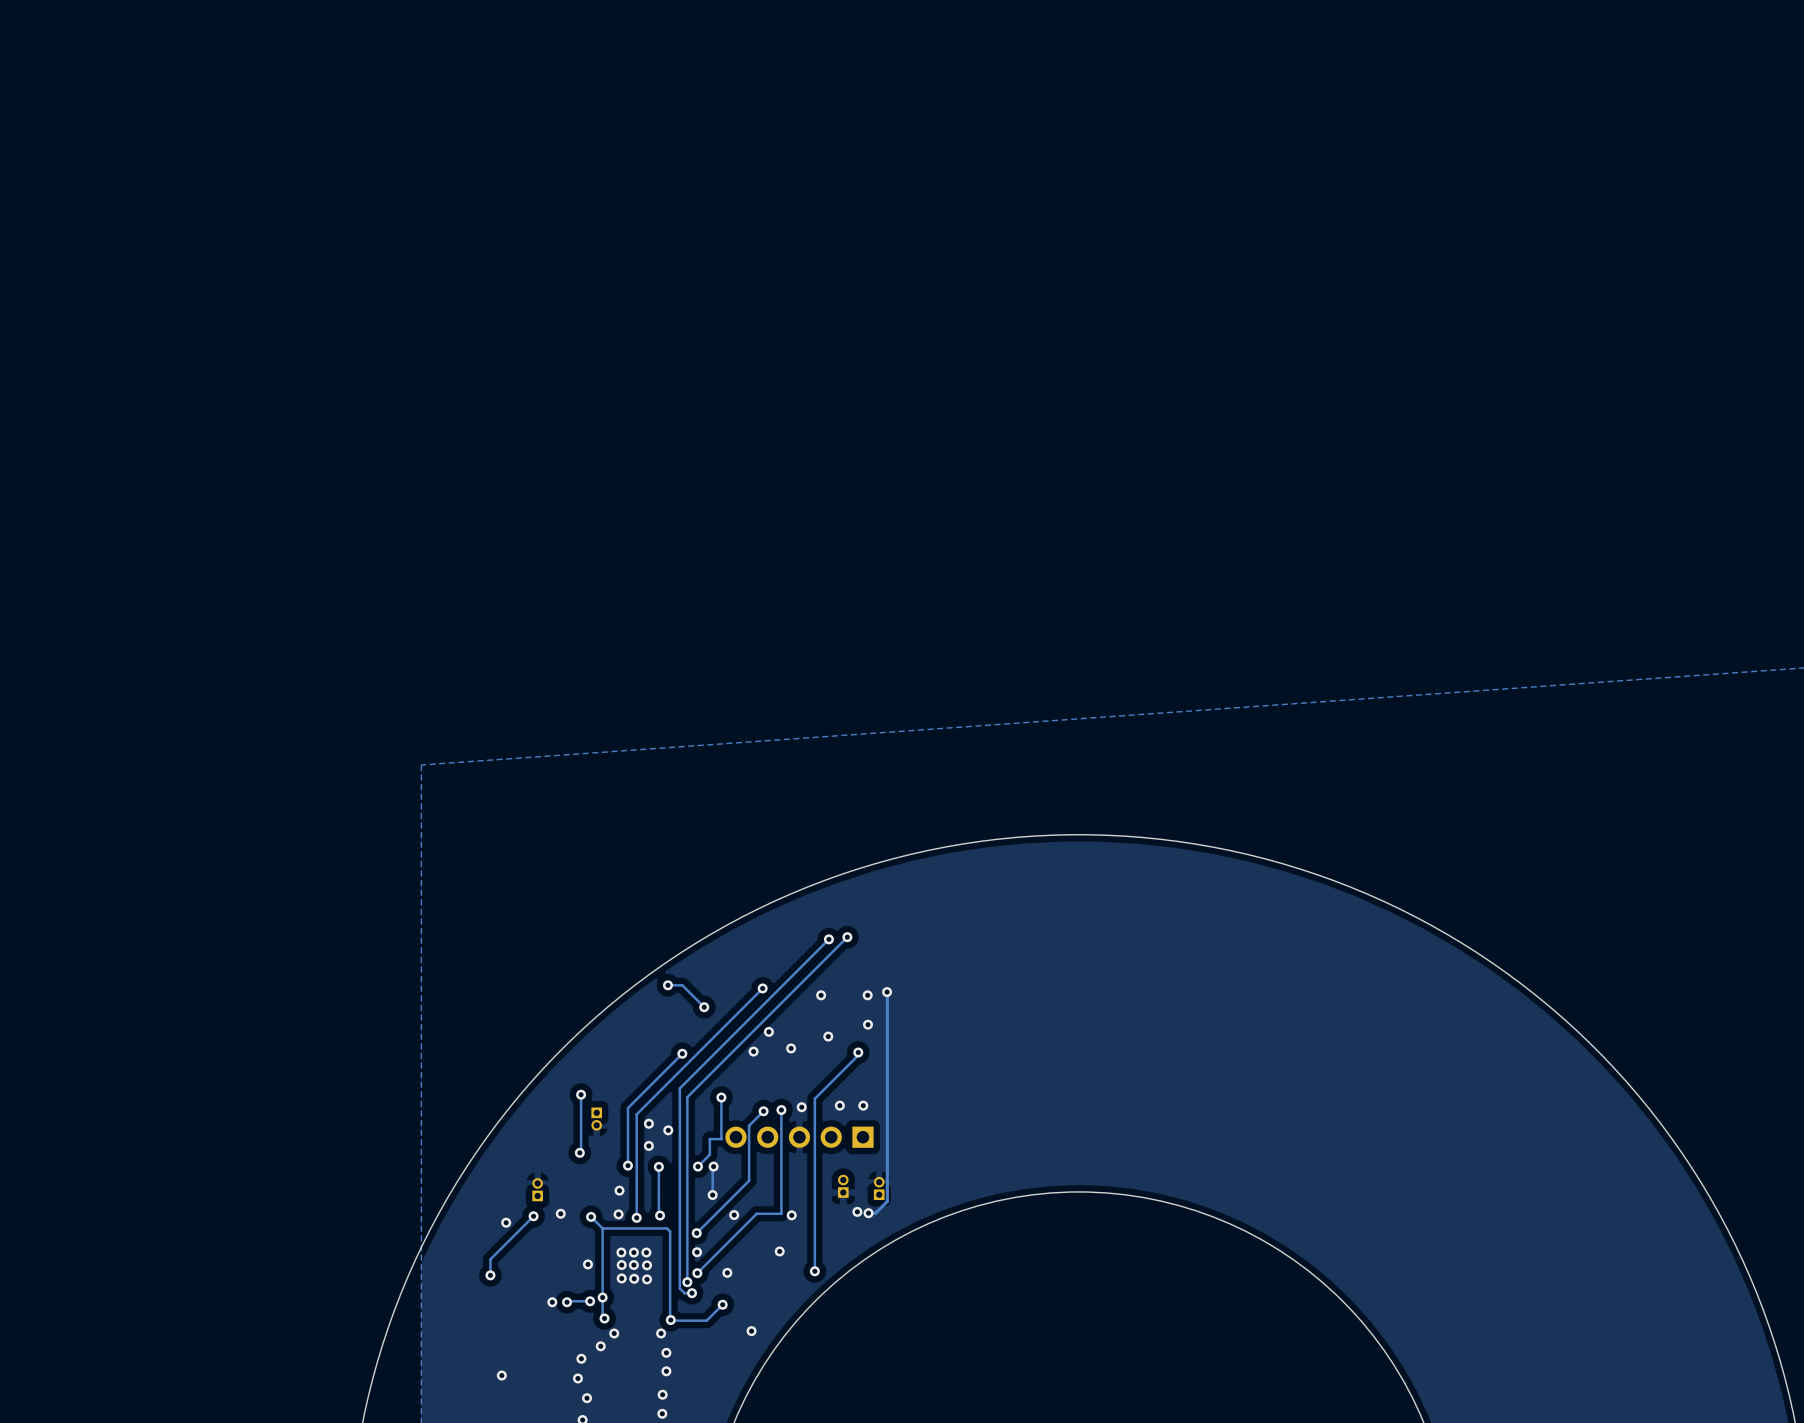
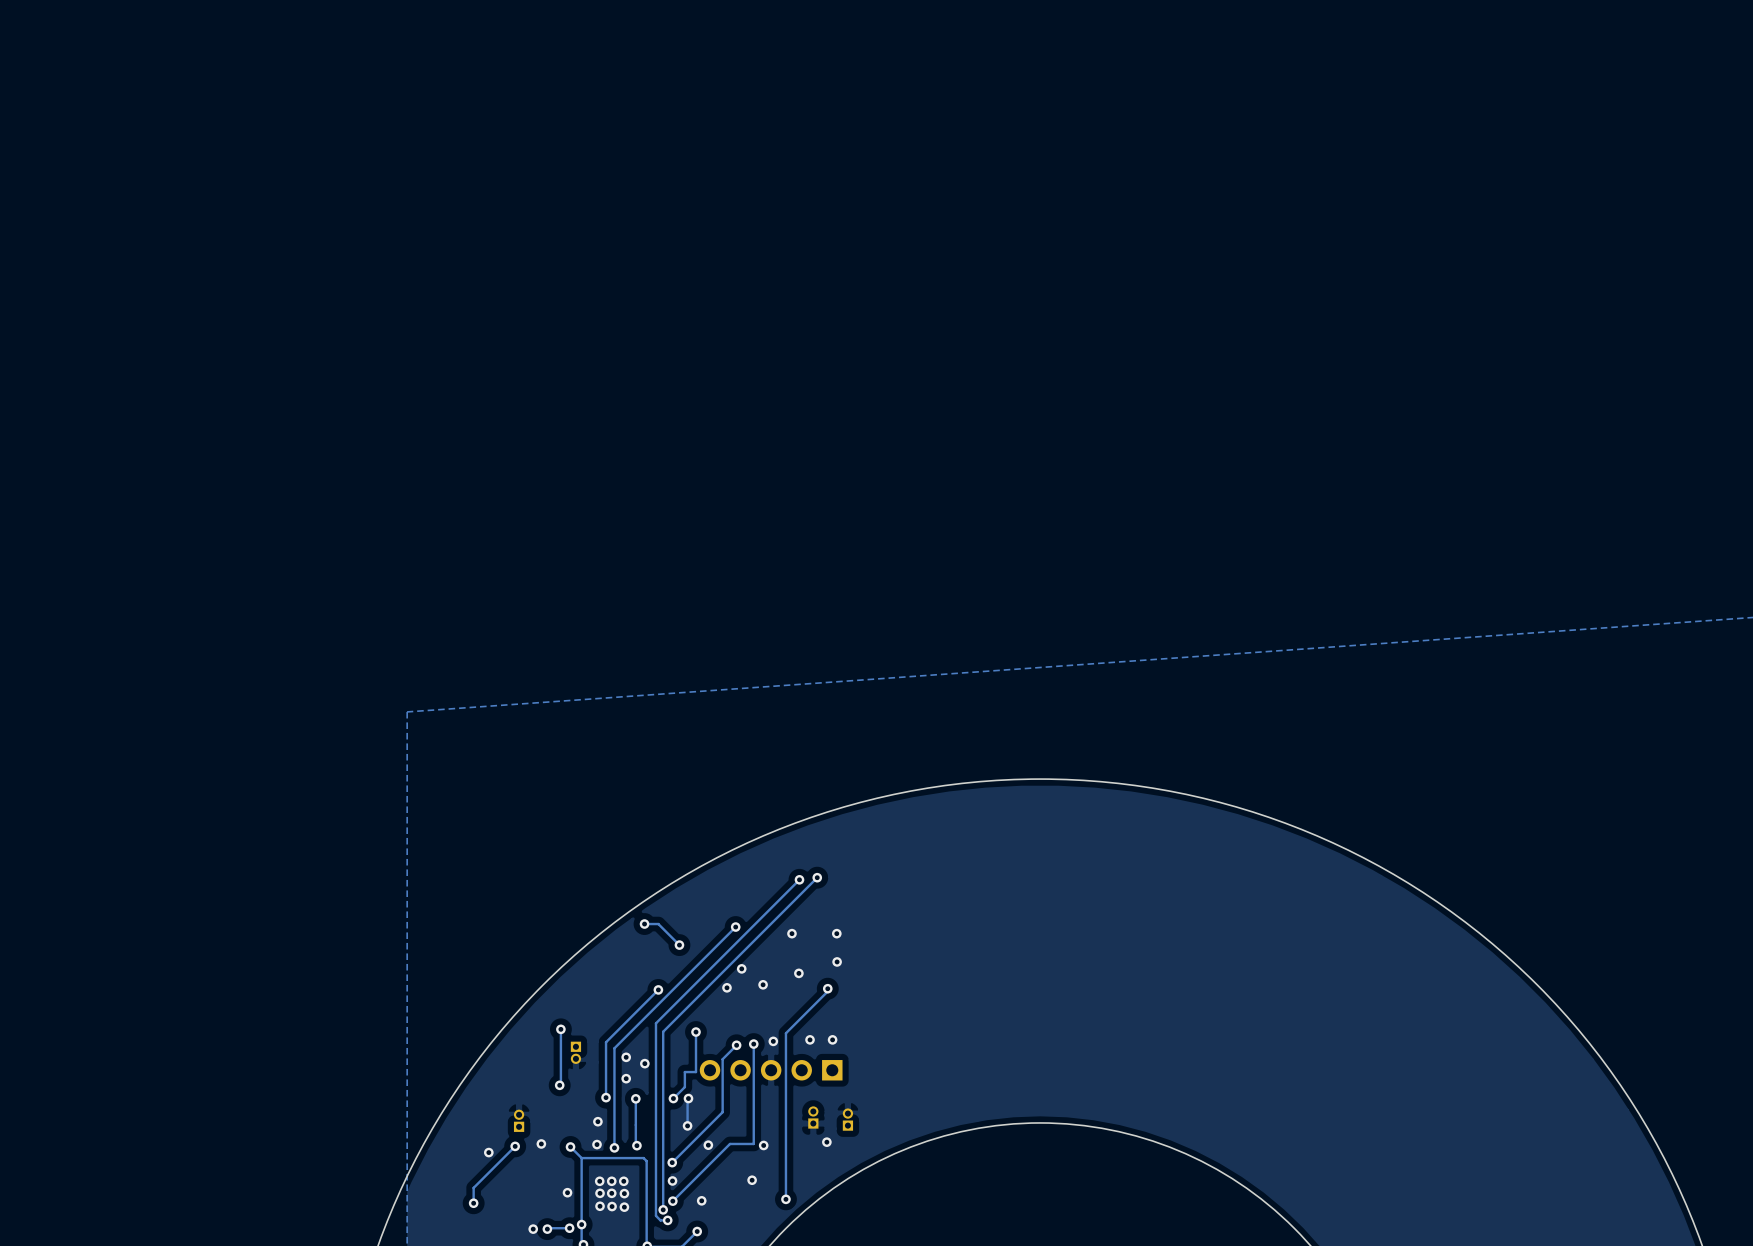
track: (887, 992) (887, 1201) (875, 1213) (868, 1213) -> none
via: (887, 992) -> none
via: (868, 1213) -> none

